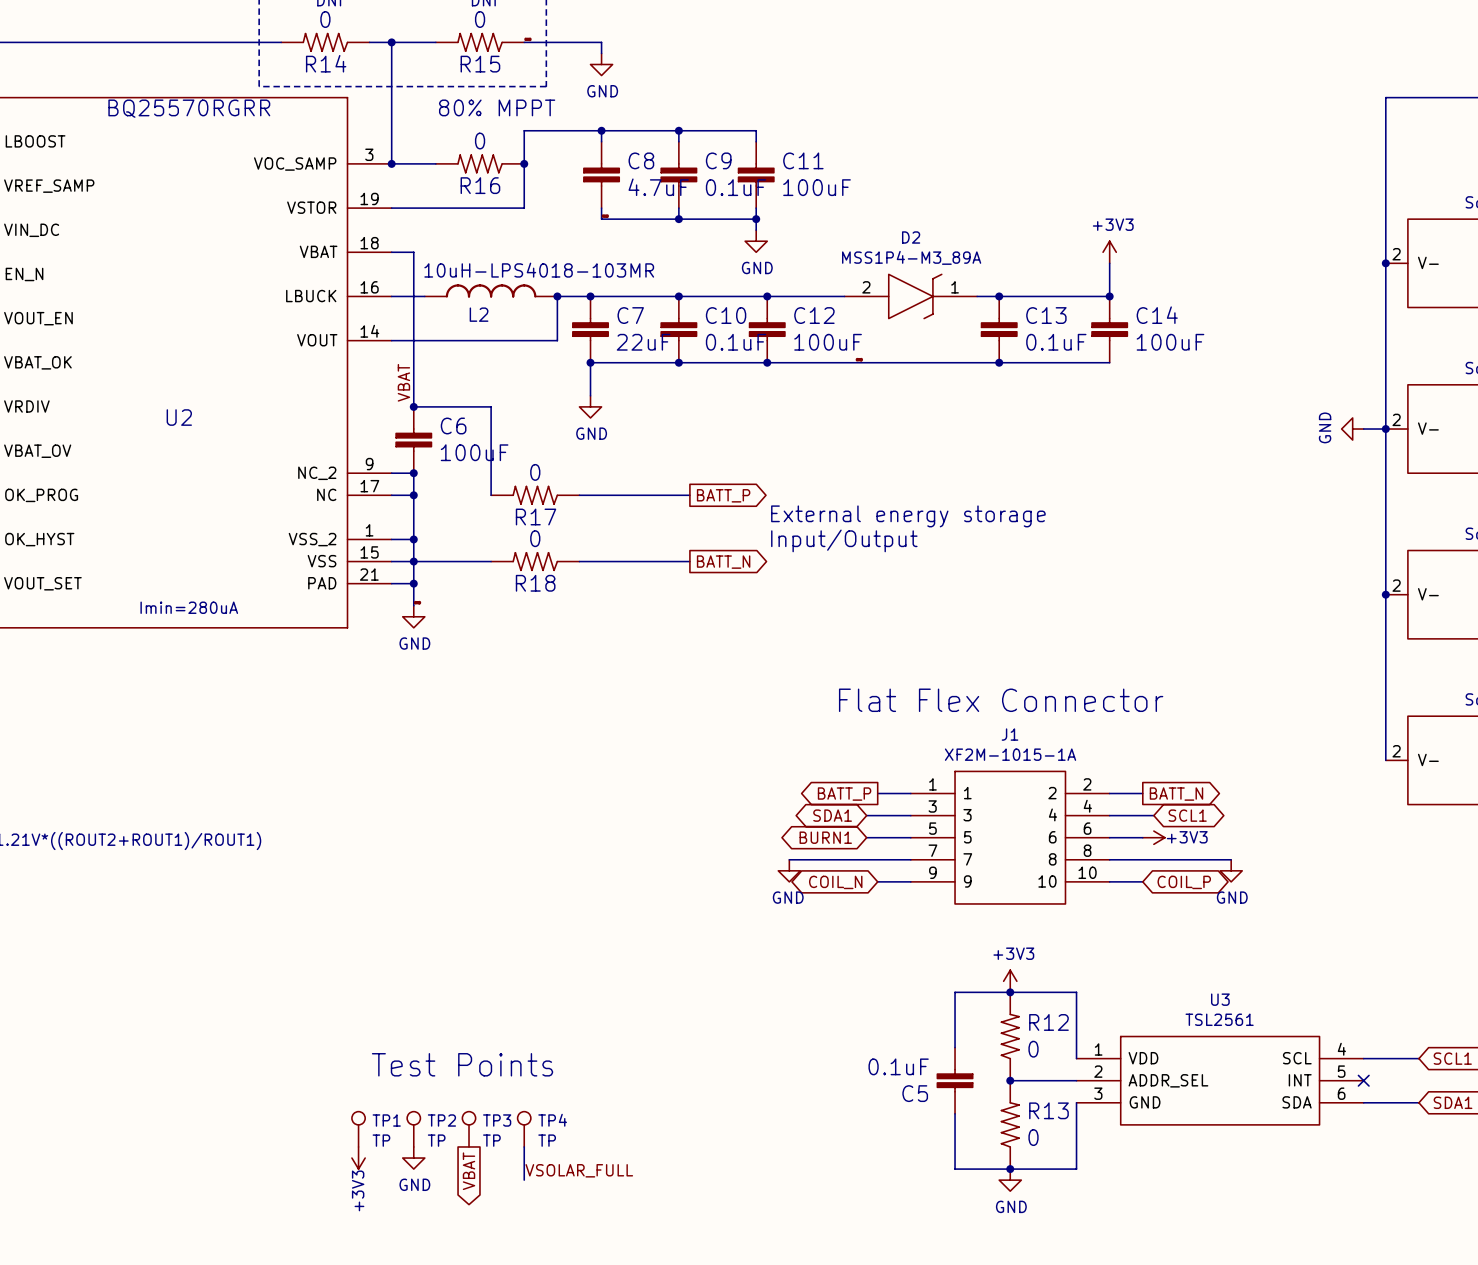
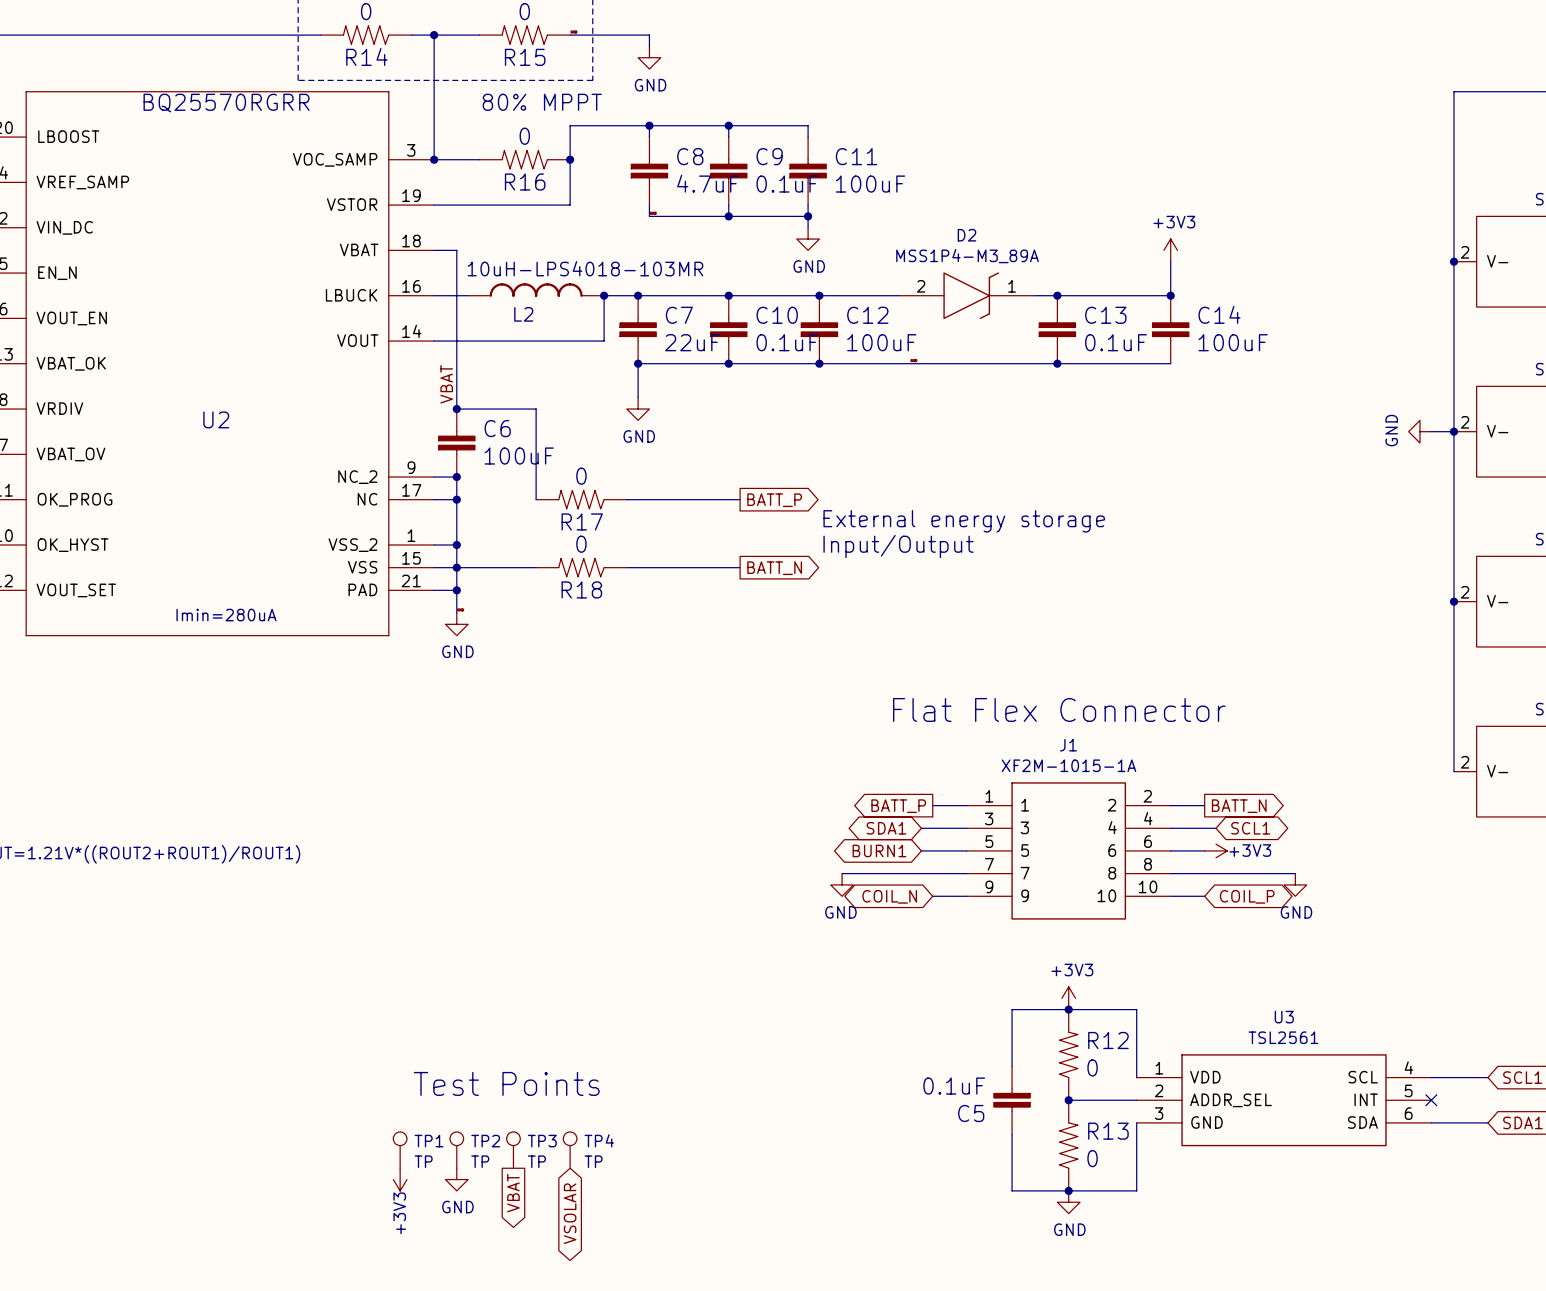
wire: (524, 1146) (524, 1180) -> none
label: VSOLAR_FULL (579, 1170) -> none
global label: none -> VSOLAR (570, 1213)

